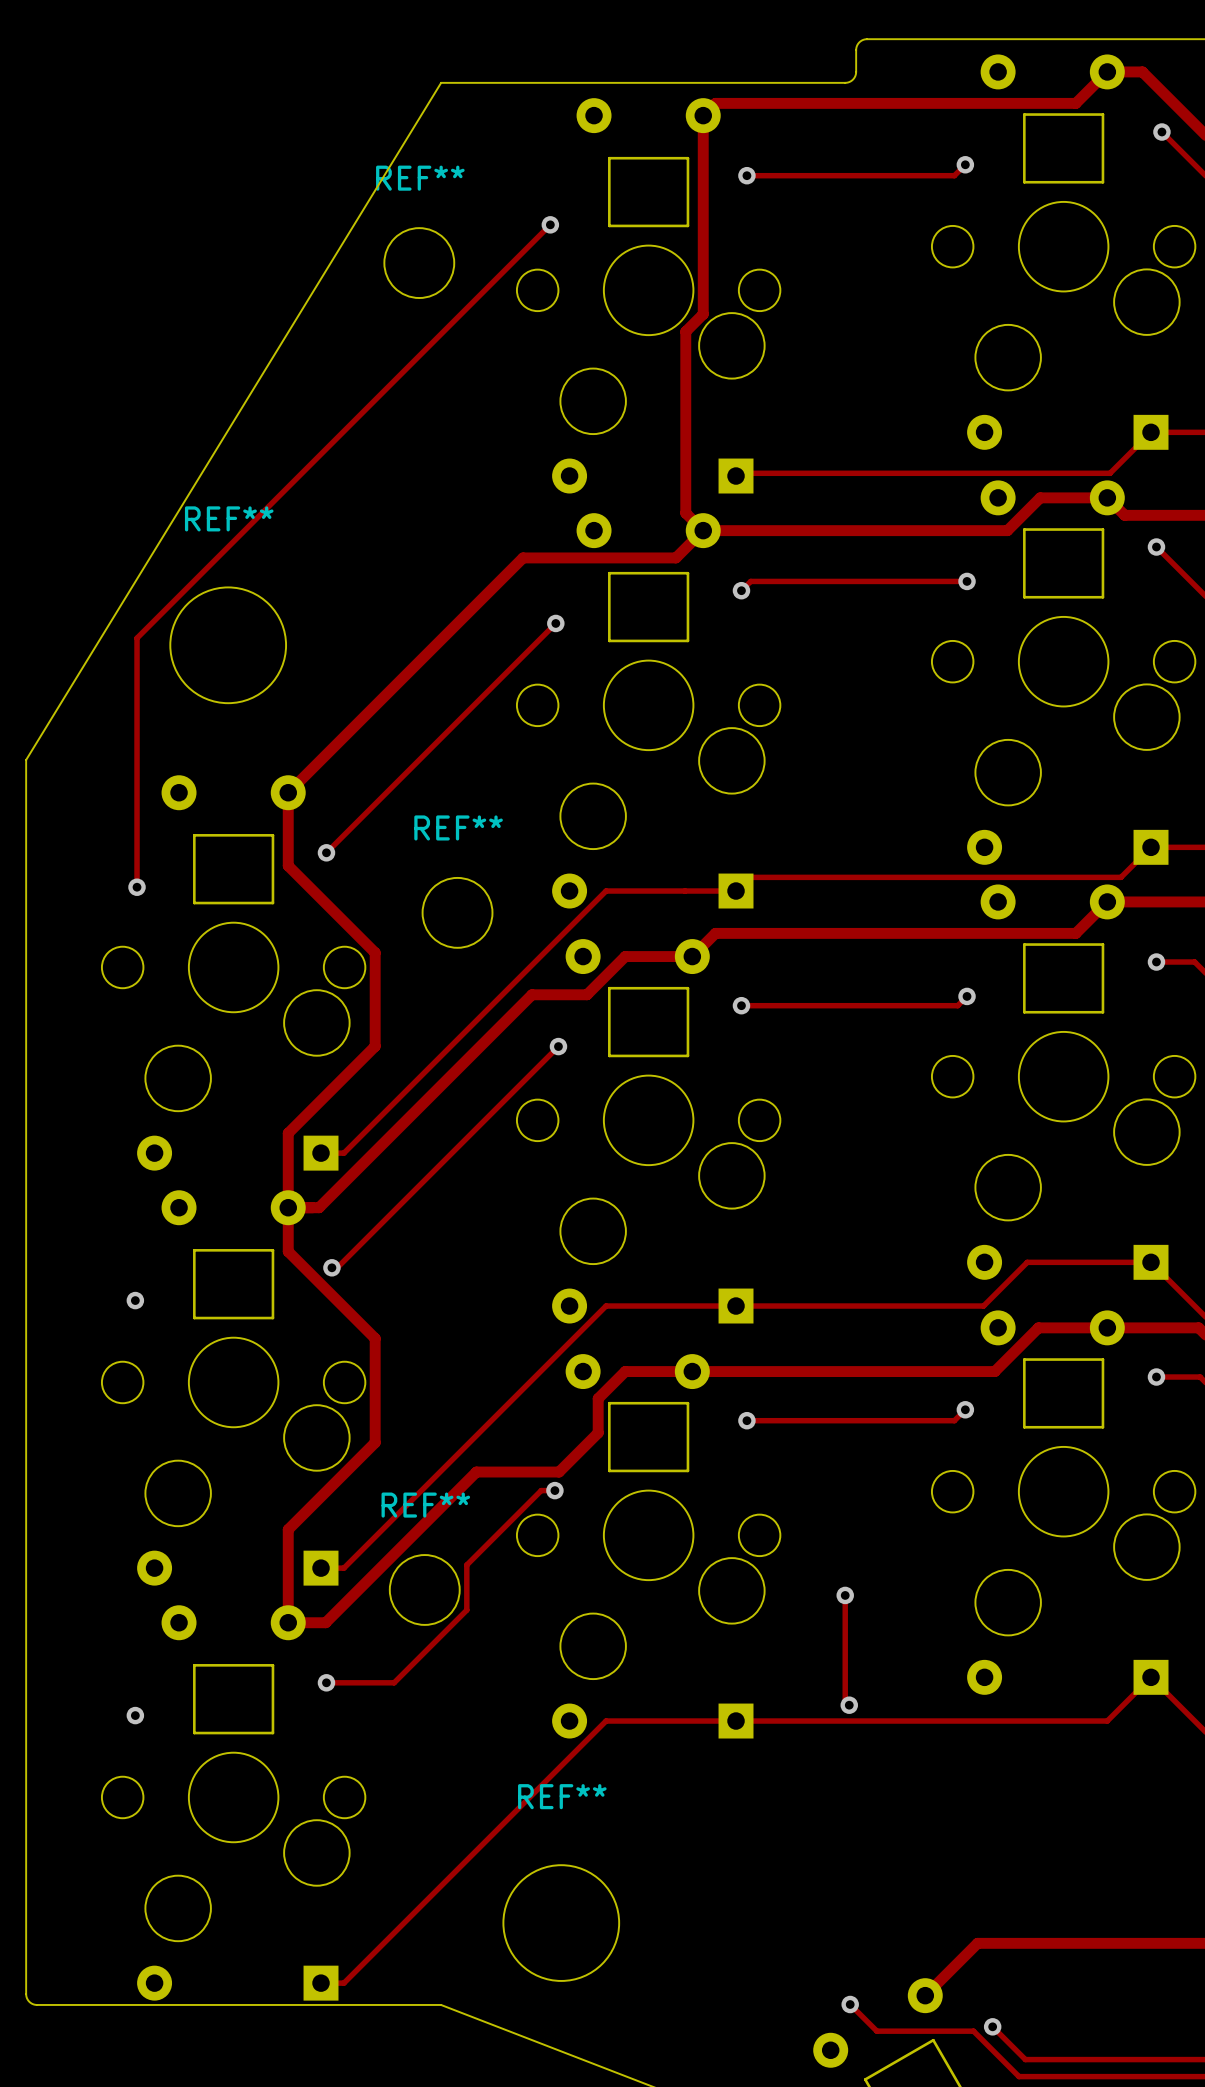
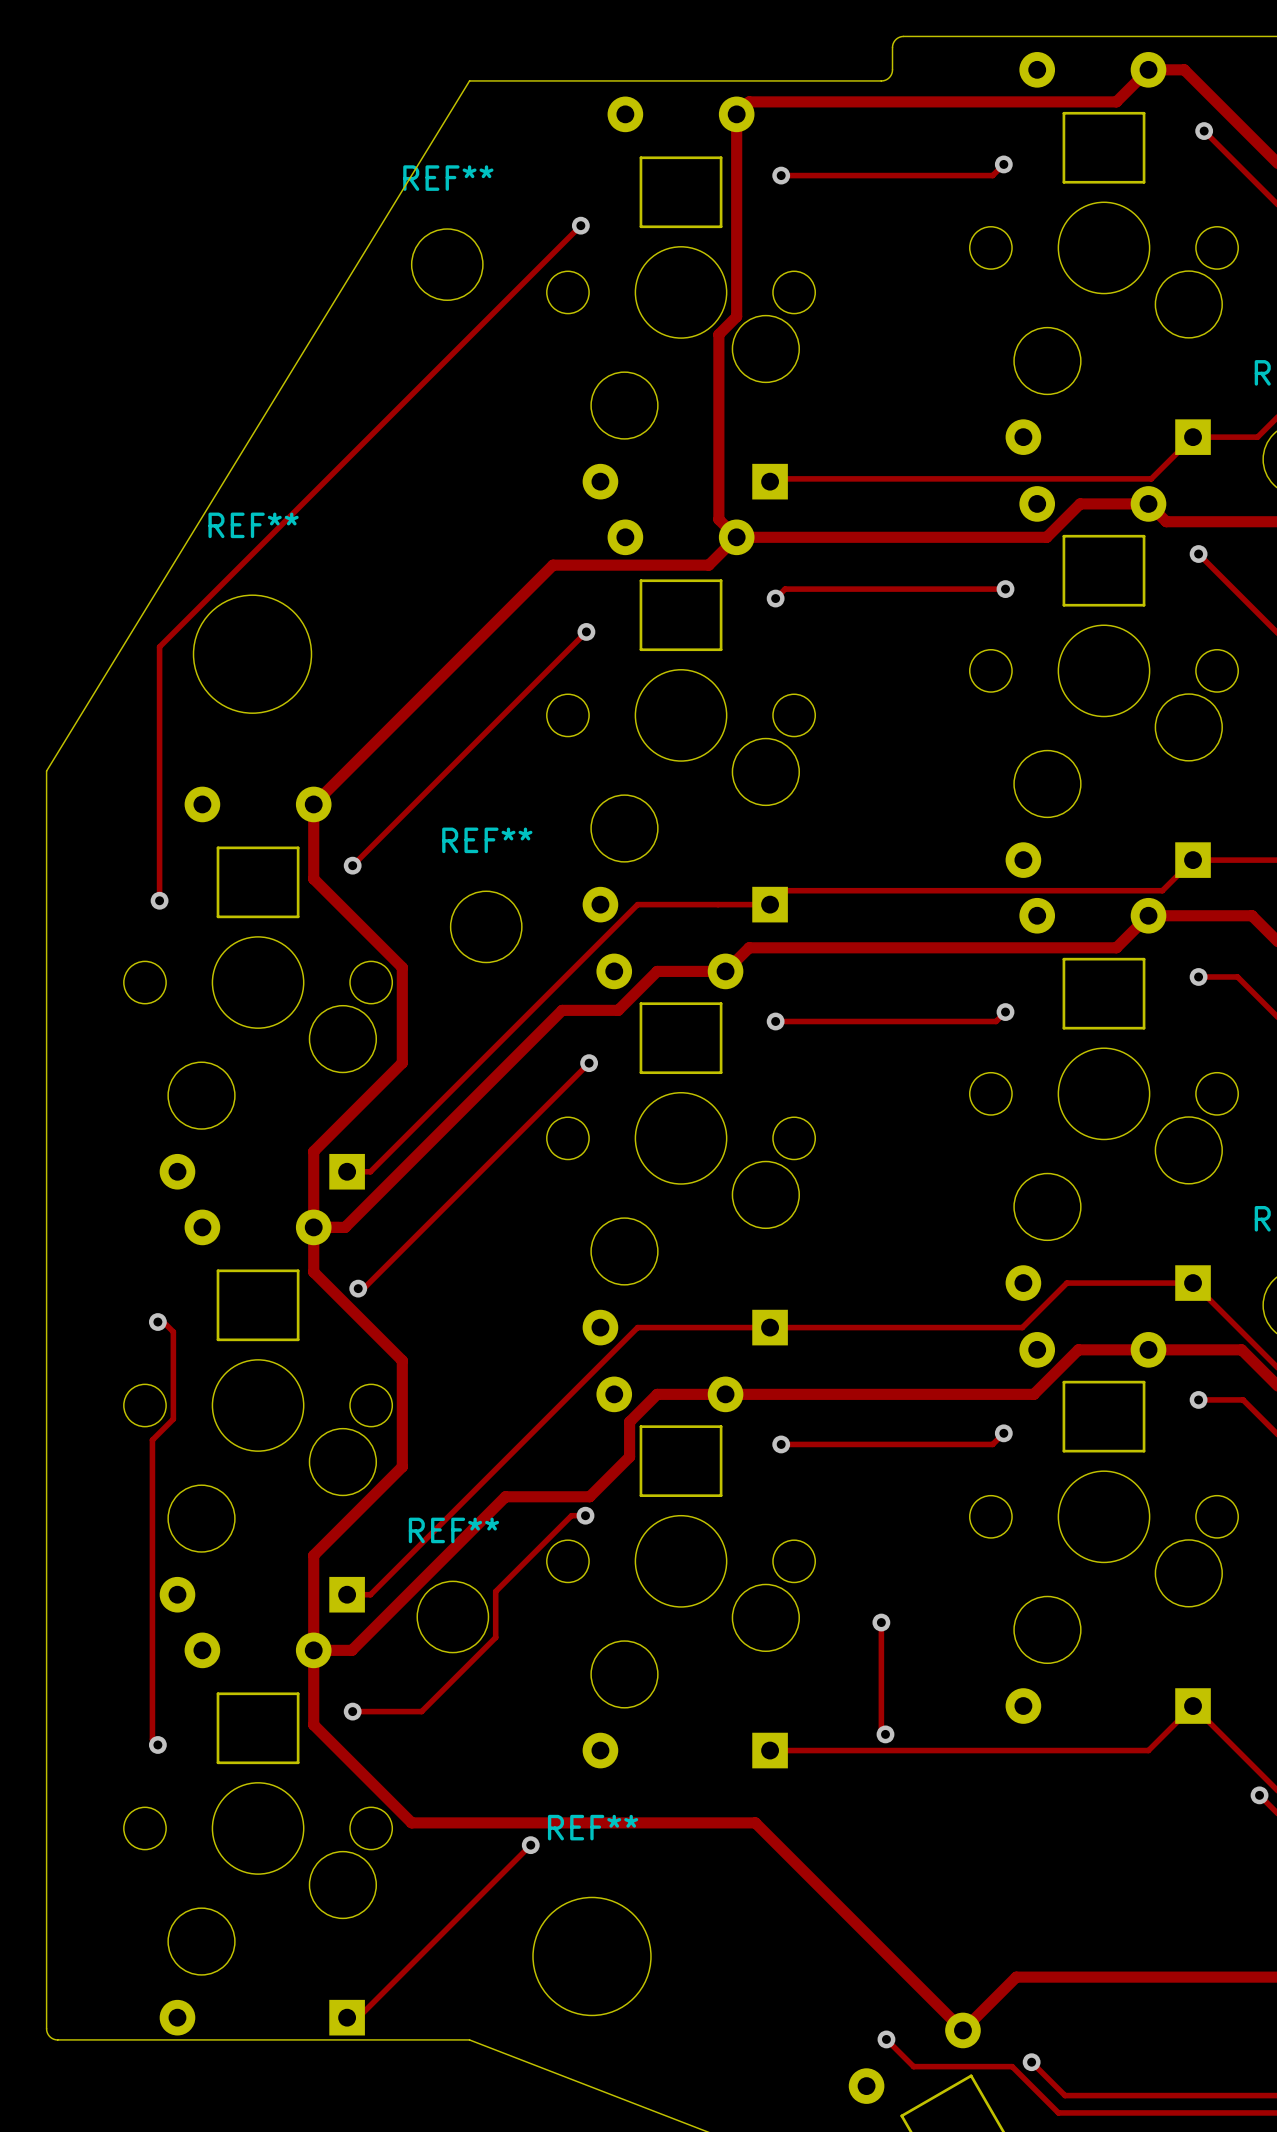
track: none -> (163, 1322) (173, 1331) (173, 1419) (152, 1440) (152, 1739) (157, 1744)
track: none -> (313, 1650) (313, 1724) (411, 1822) (755, 1822) (962, 2030)
track: (736, 1721) (606, 1721) (343, 1983) (331, 1983) -> (530, 1845) (358, 2017)
via: none -> (530, 1845)

